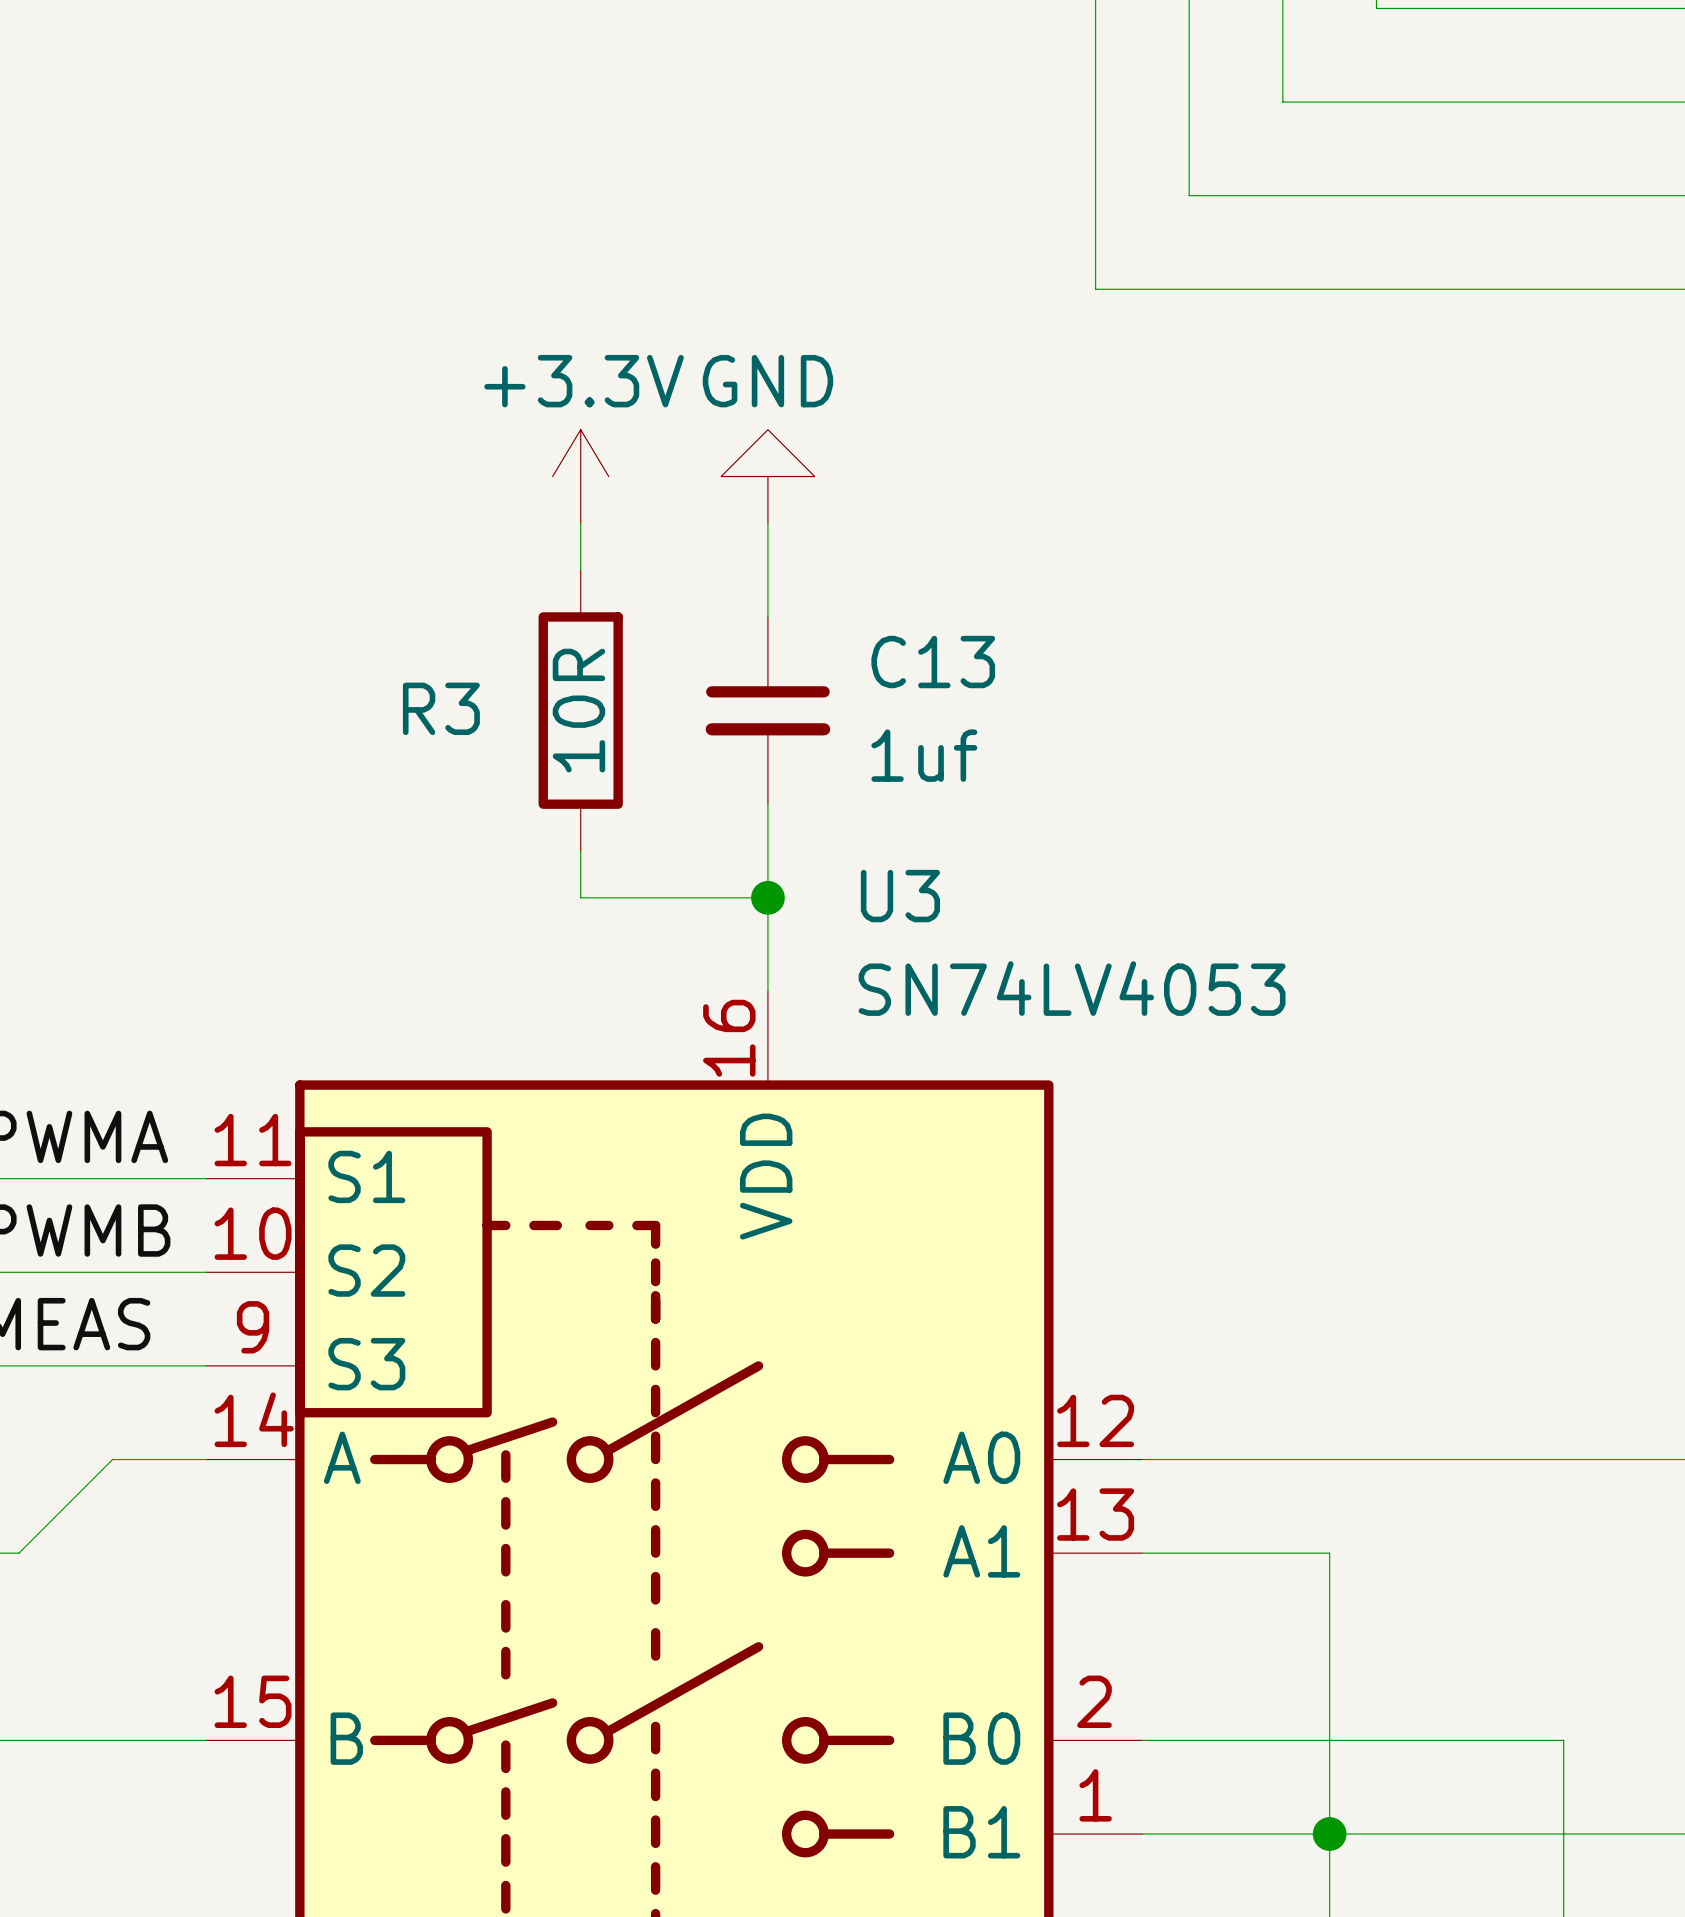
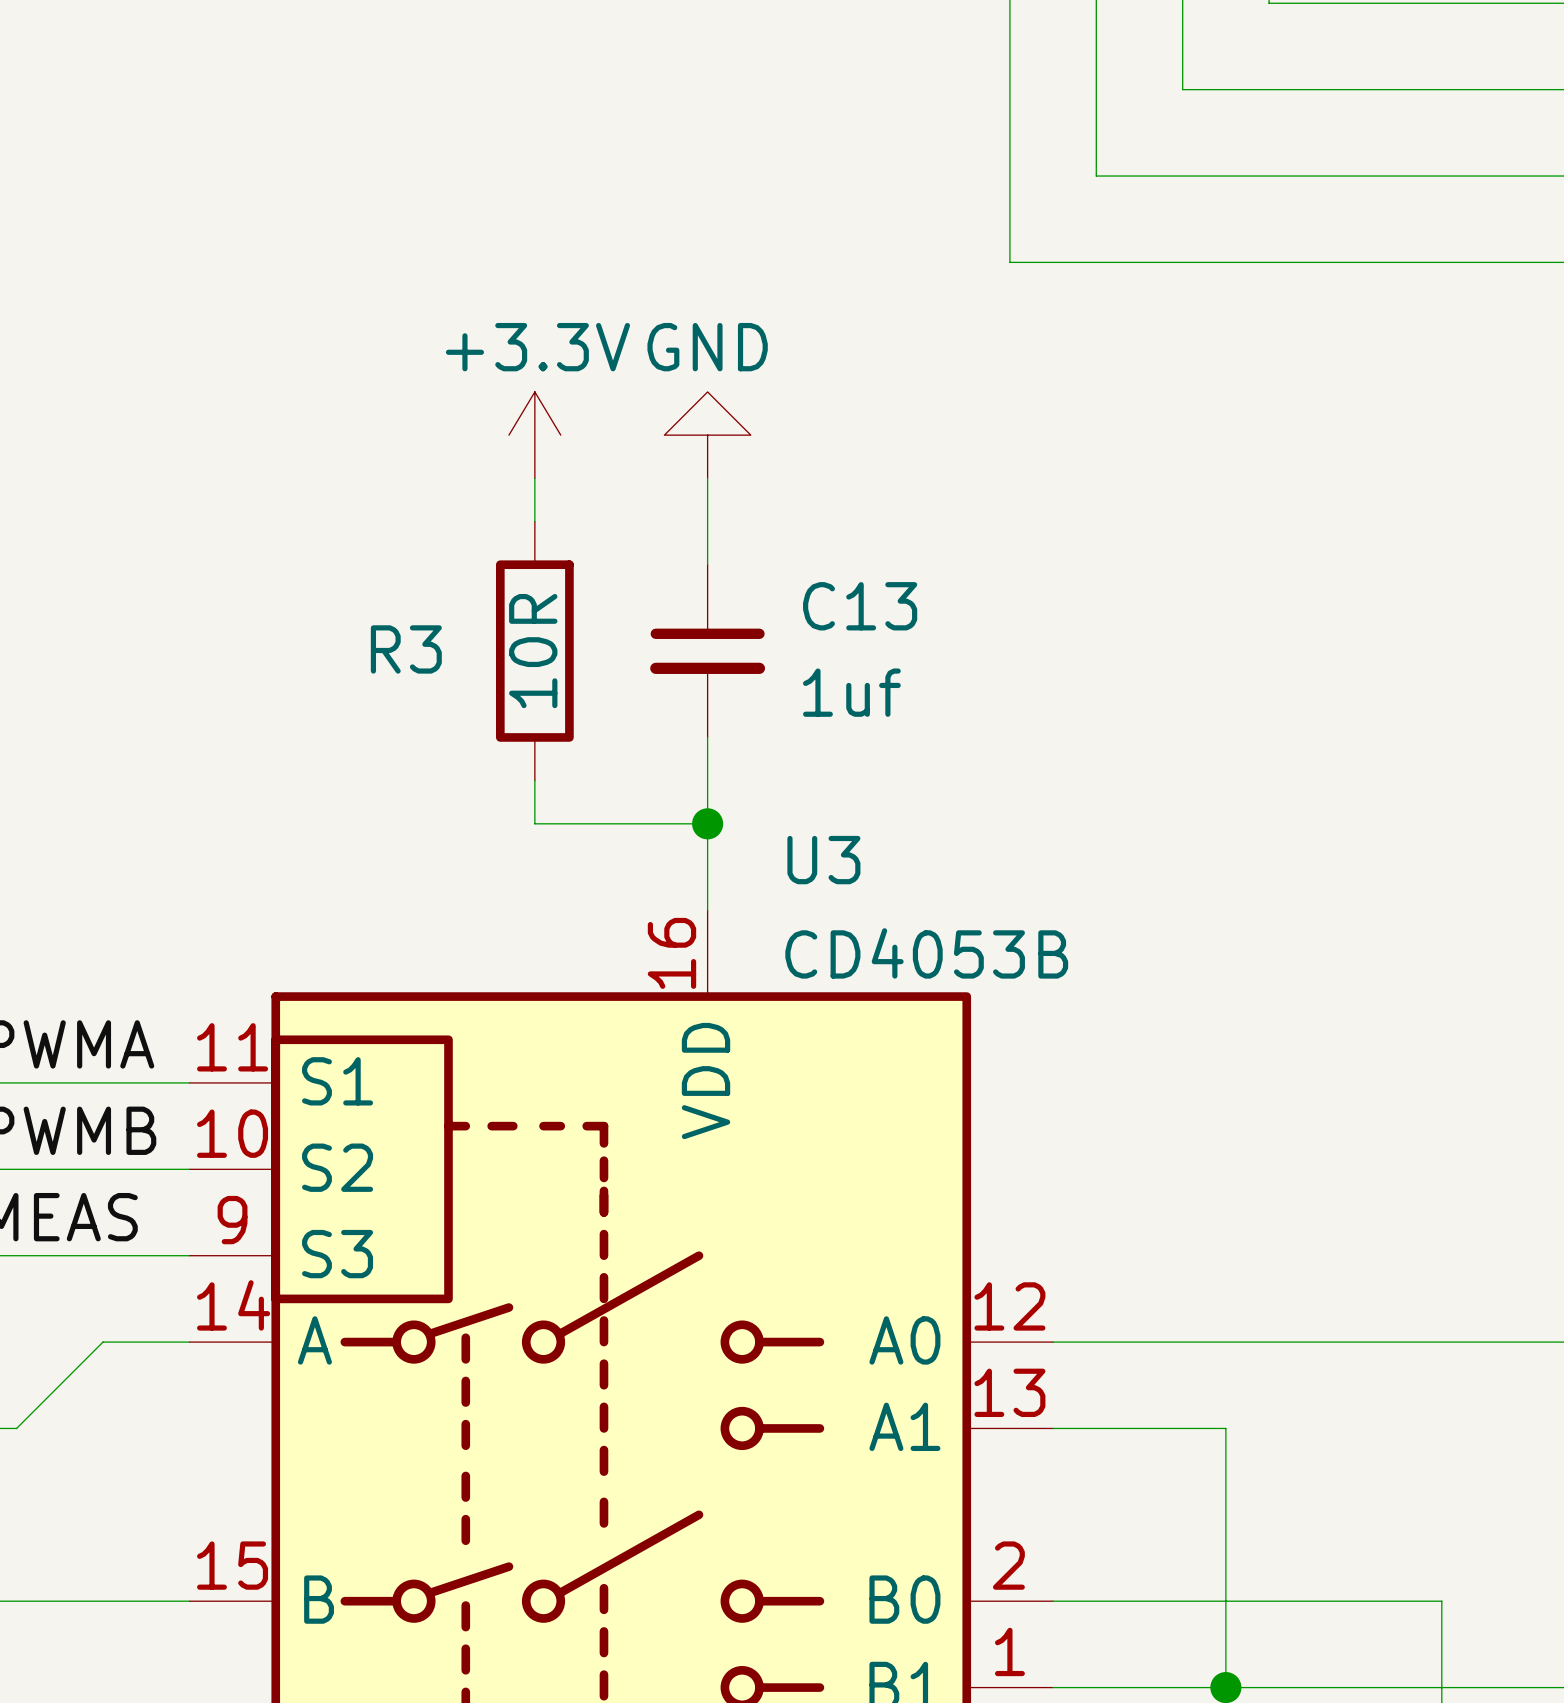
U3 name position: U3 (900, 896) -> U3 (823, 860)
U3 value: SN74LV4053 (1072, 988) -> CD4053B (926, 953)

